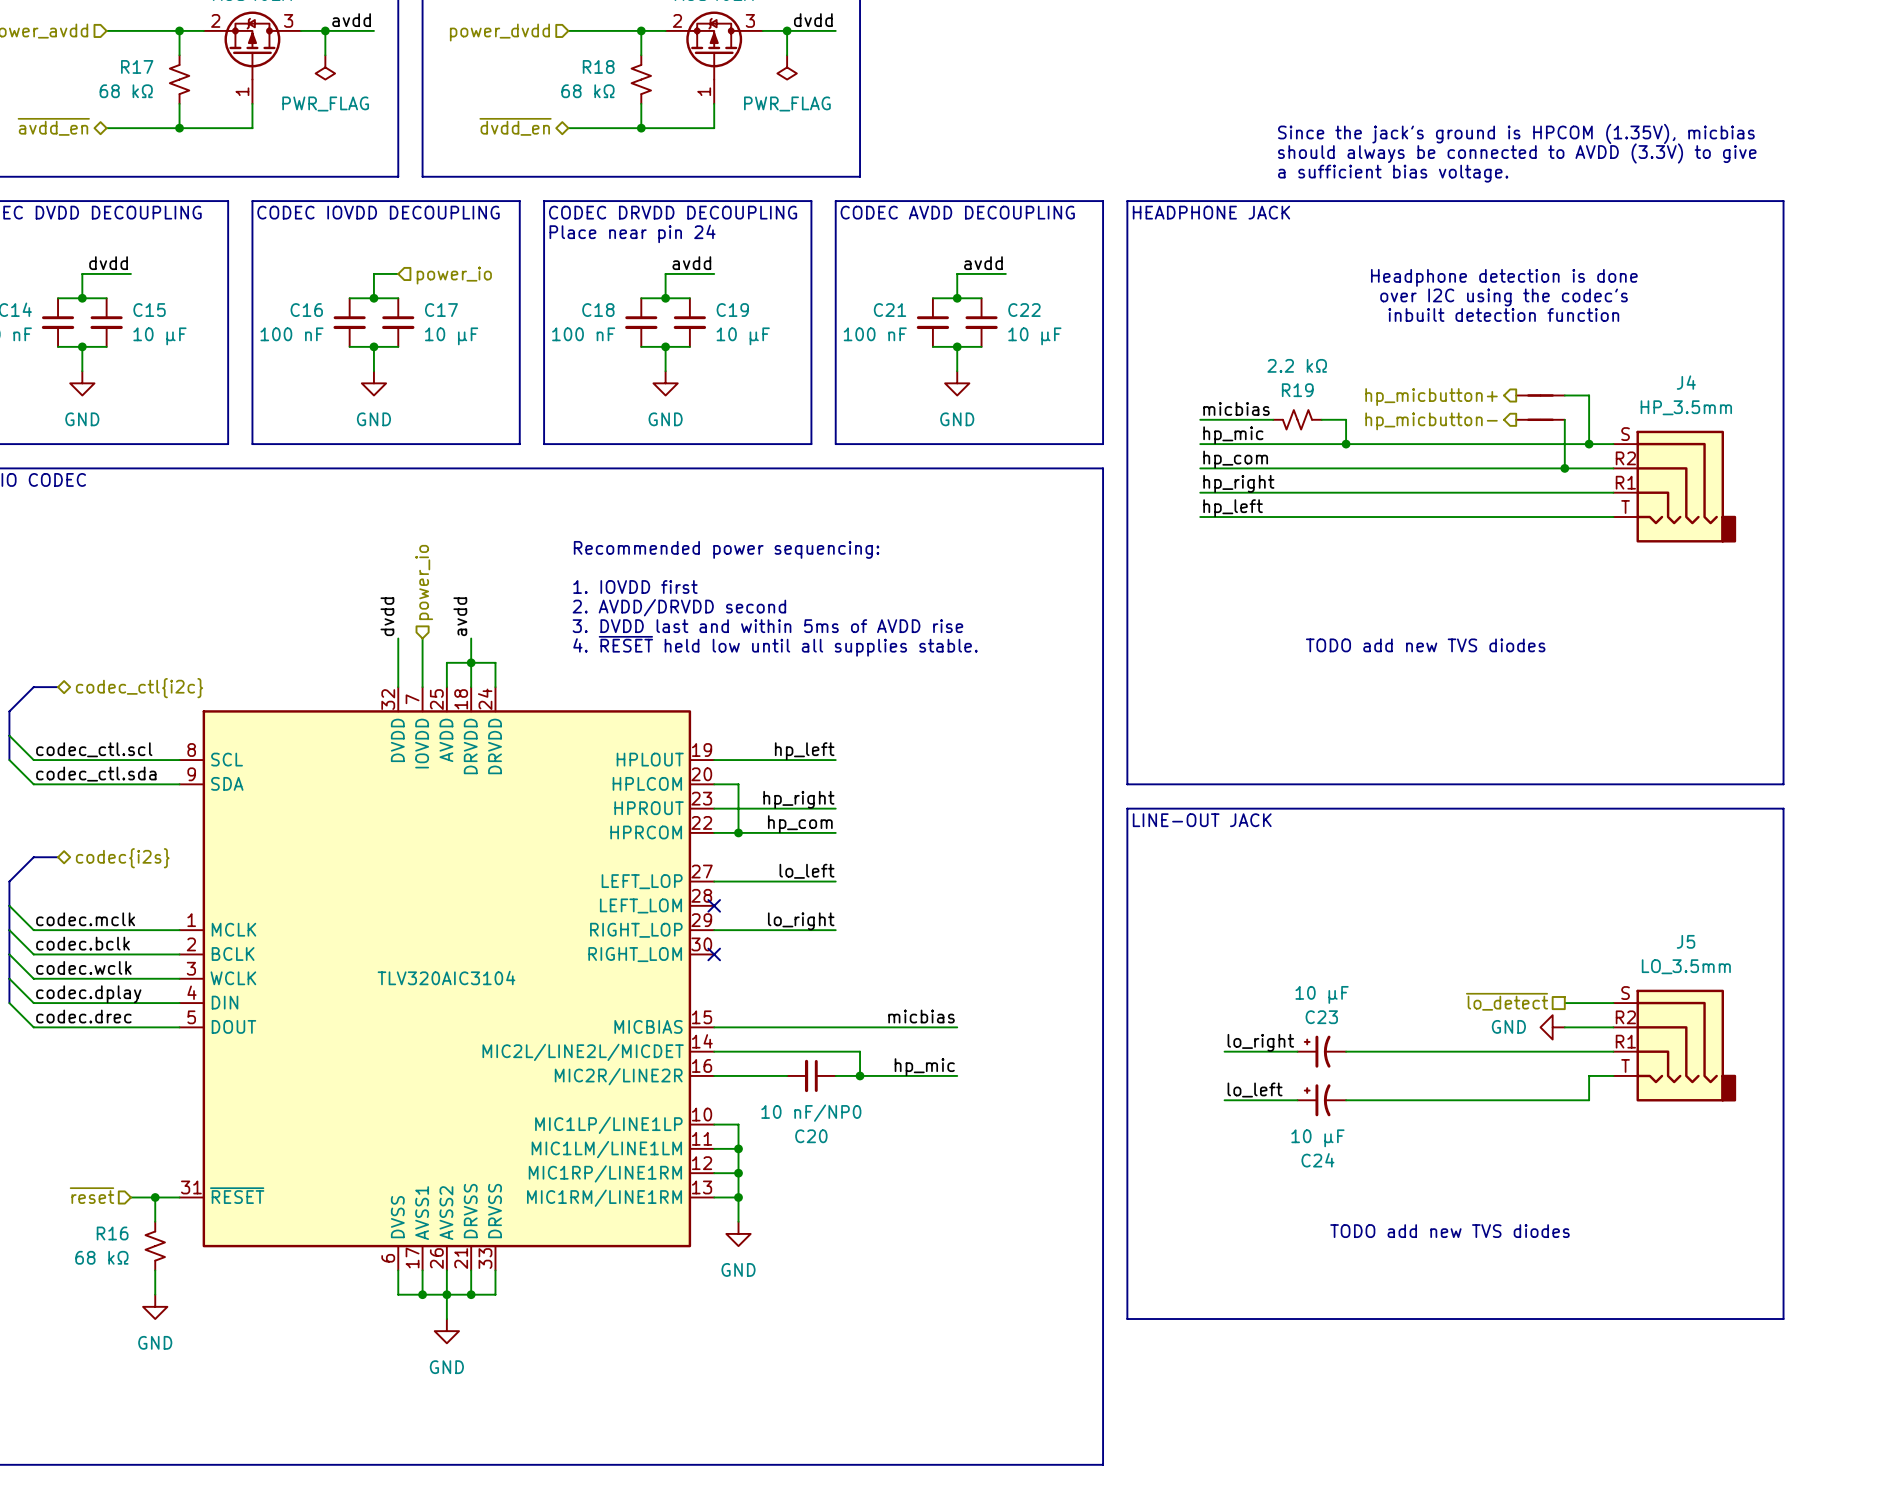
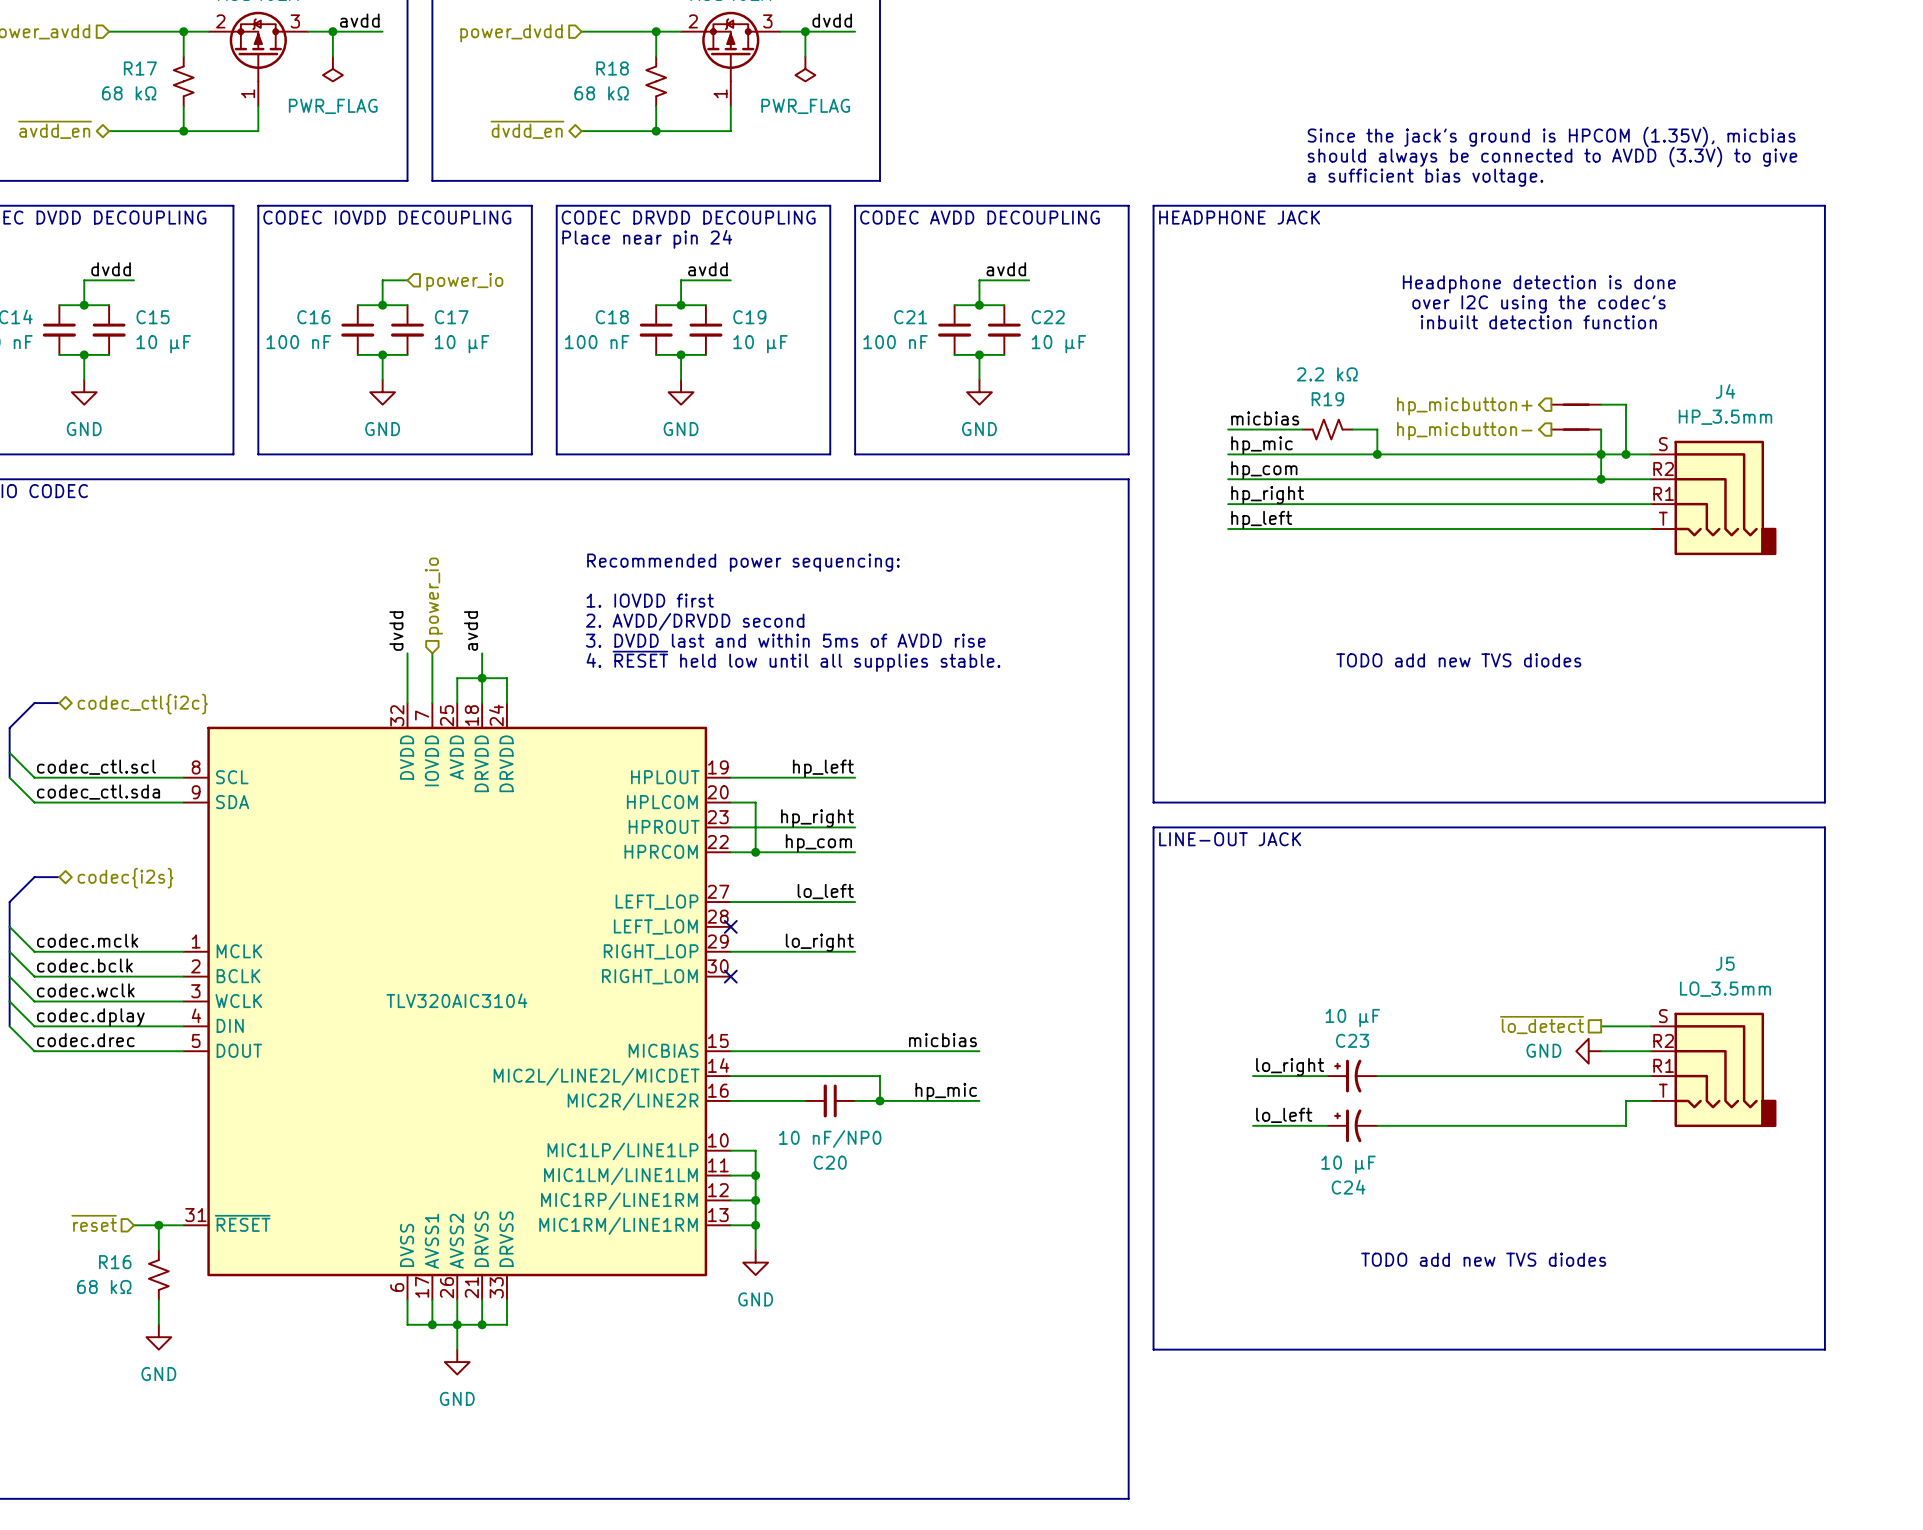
junction: none -> (1601, 454)

